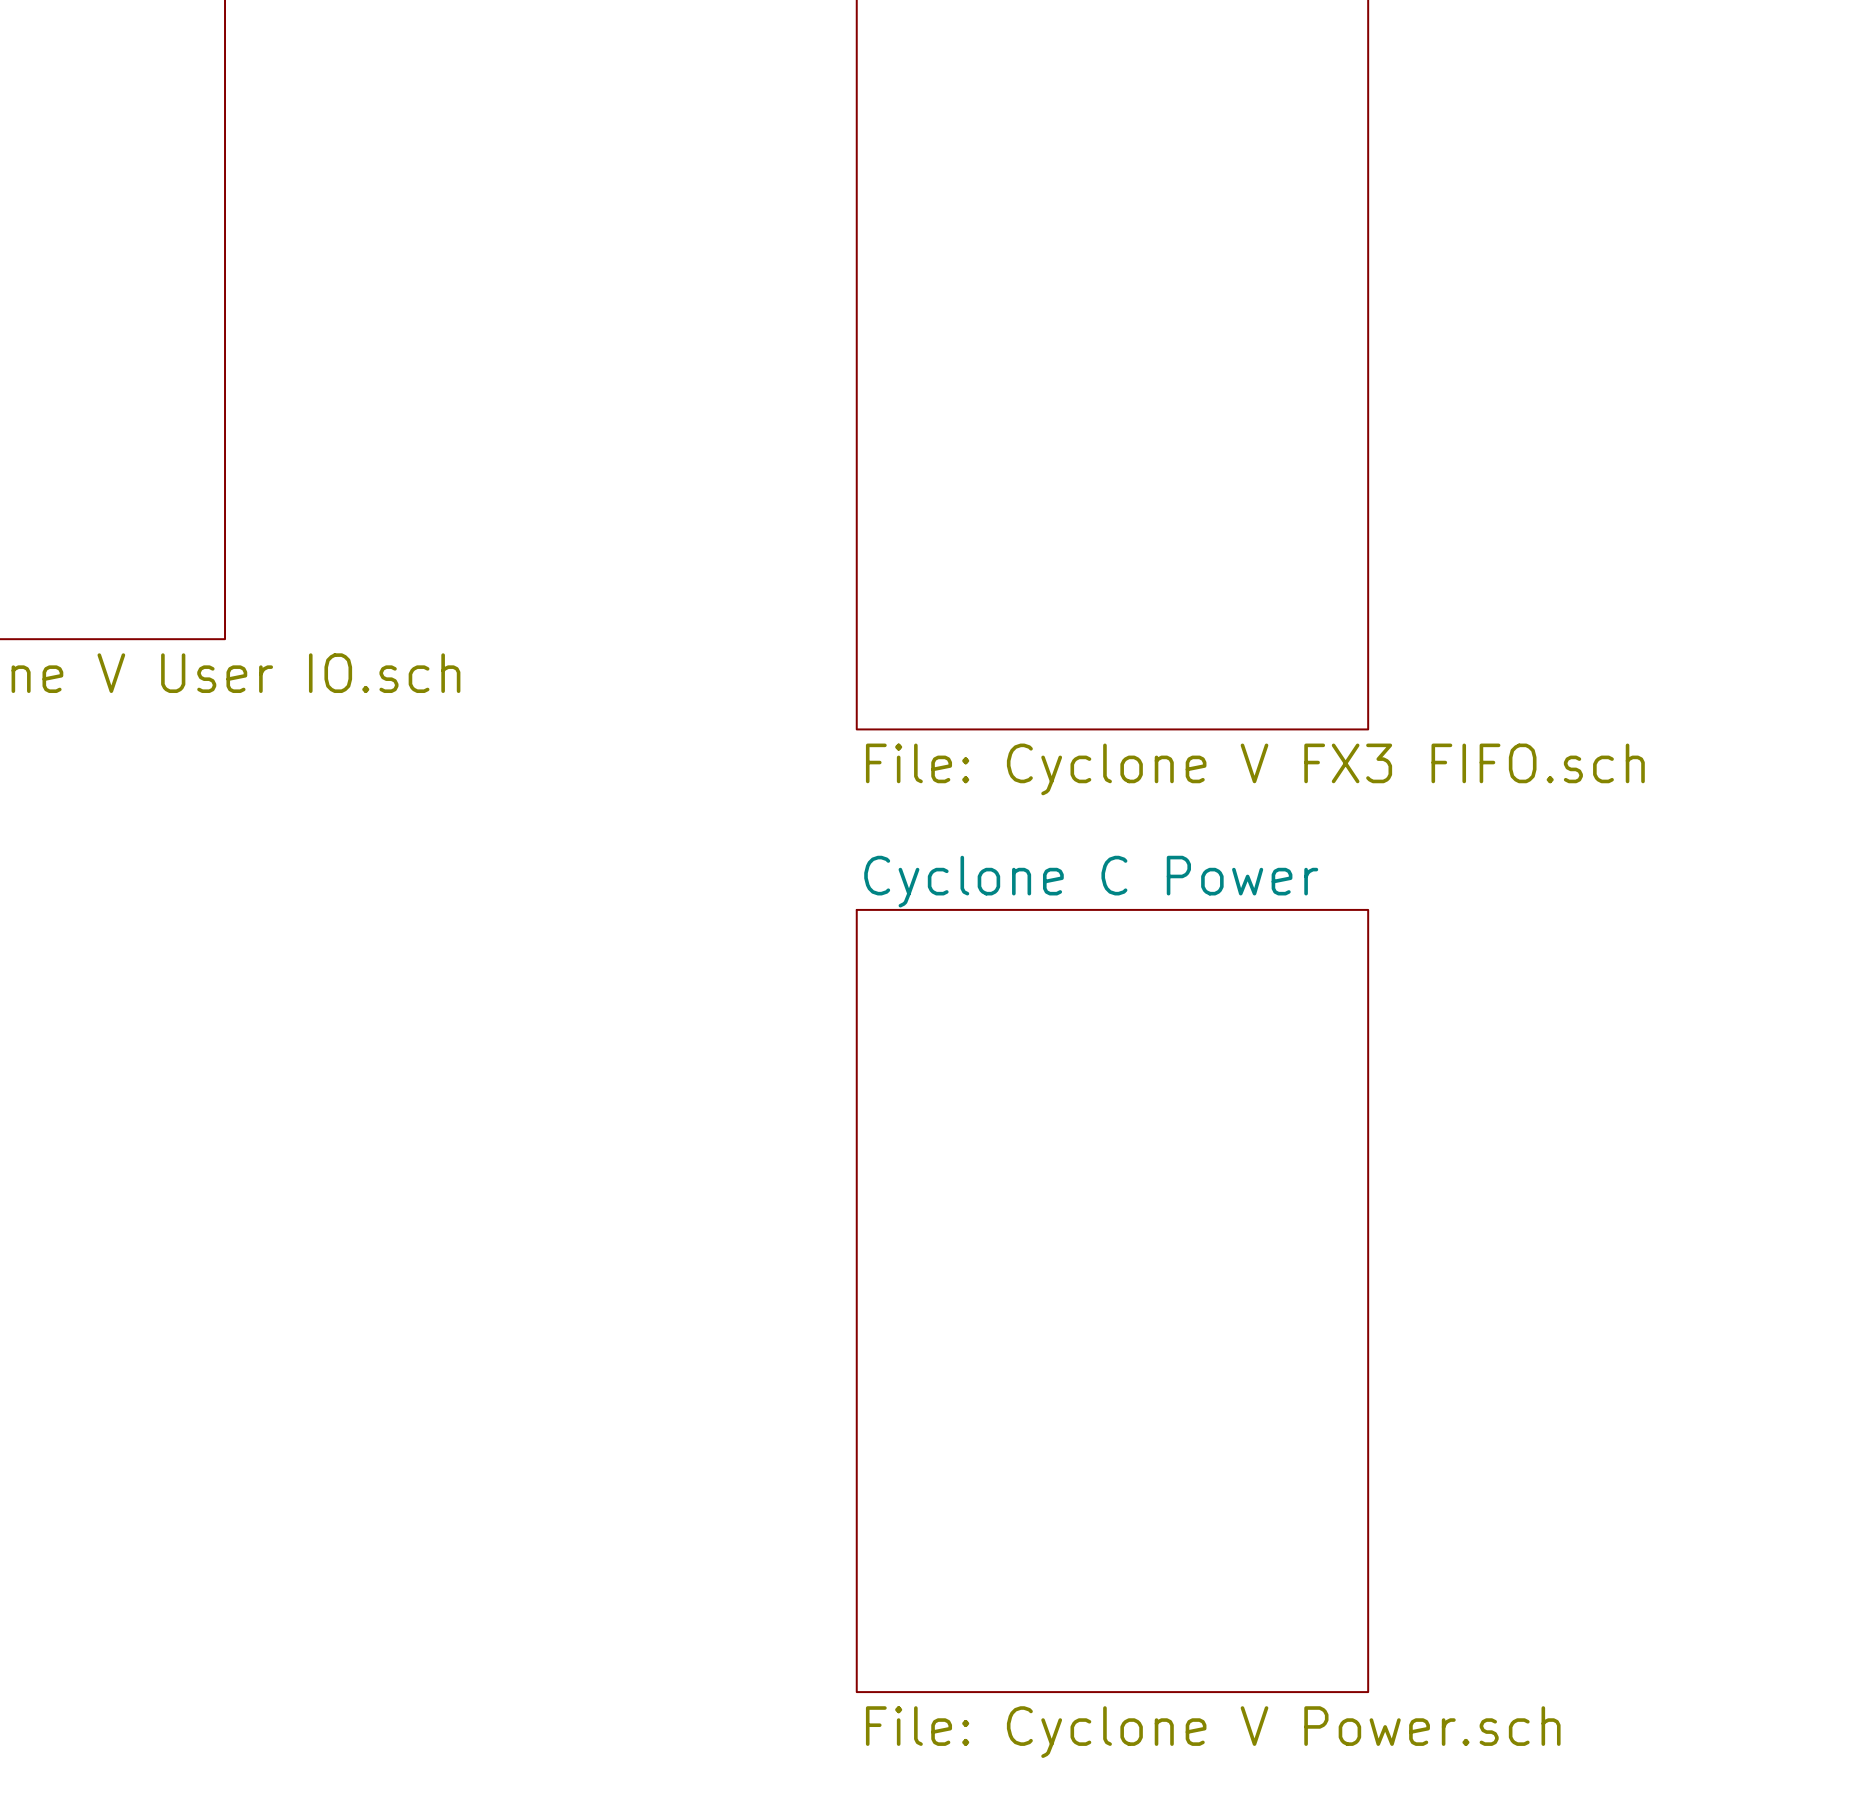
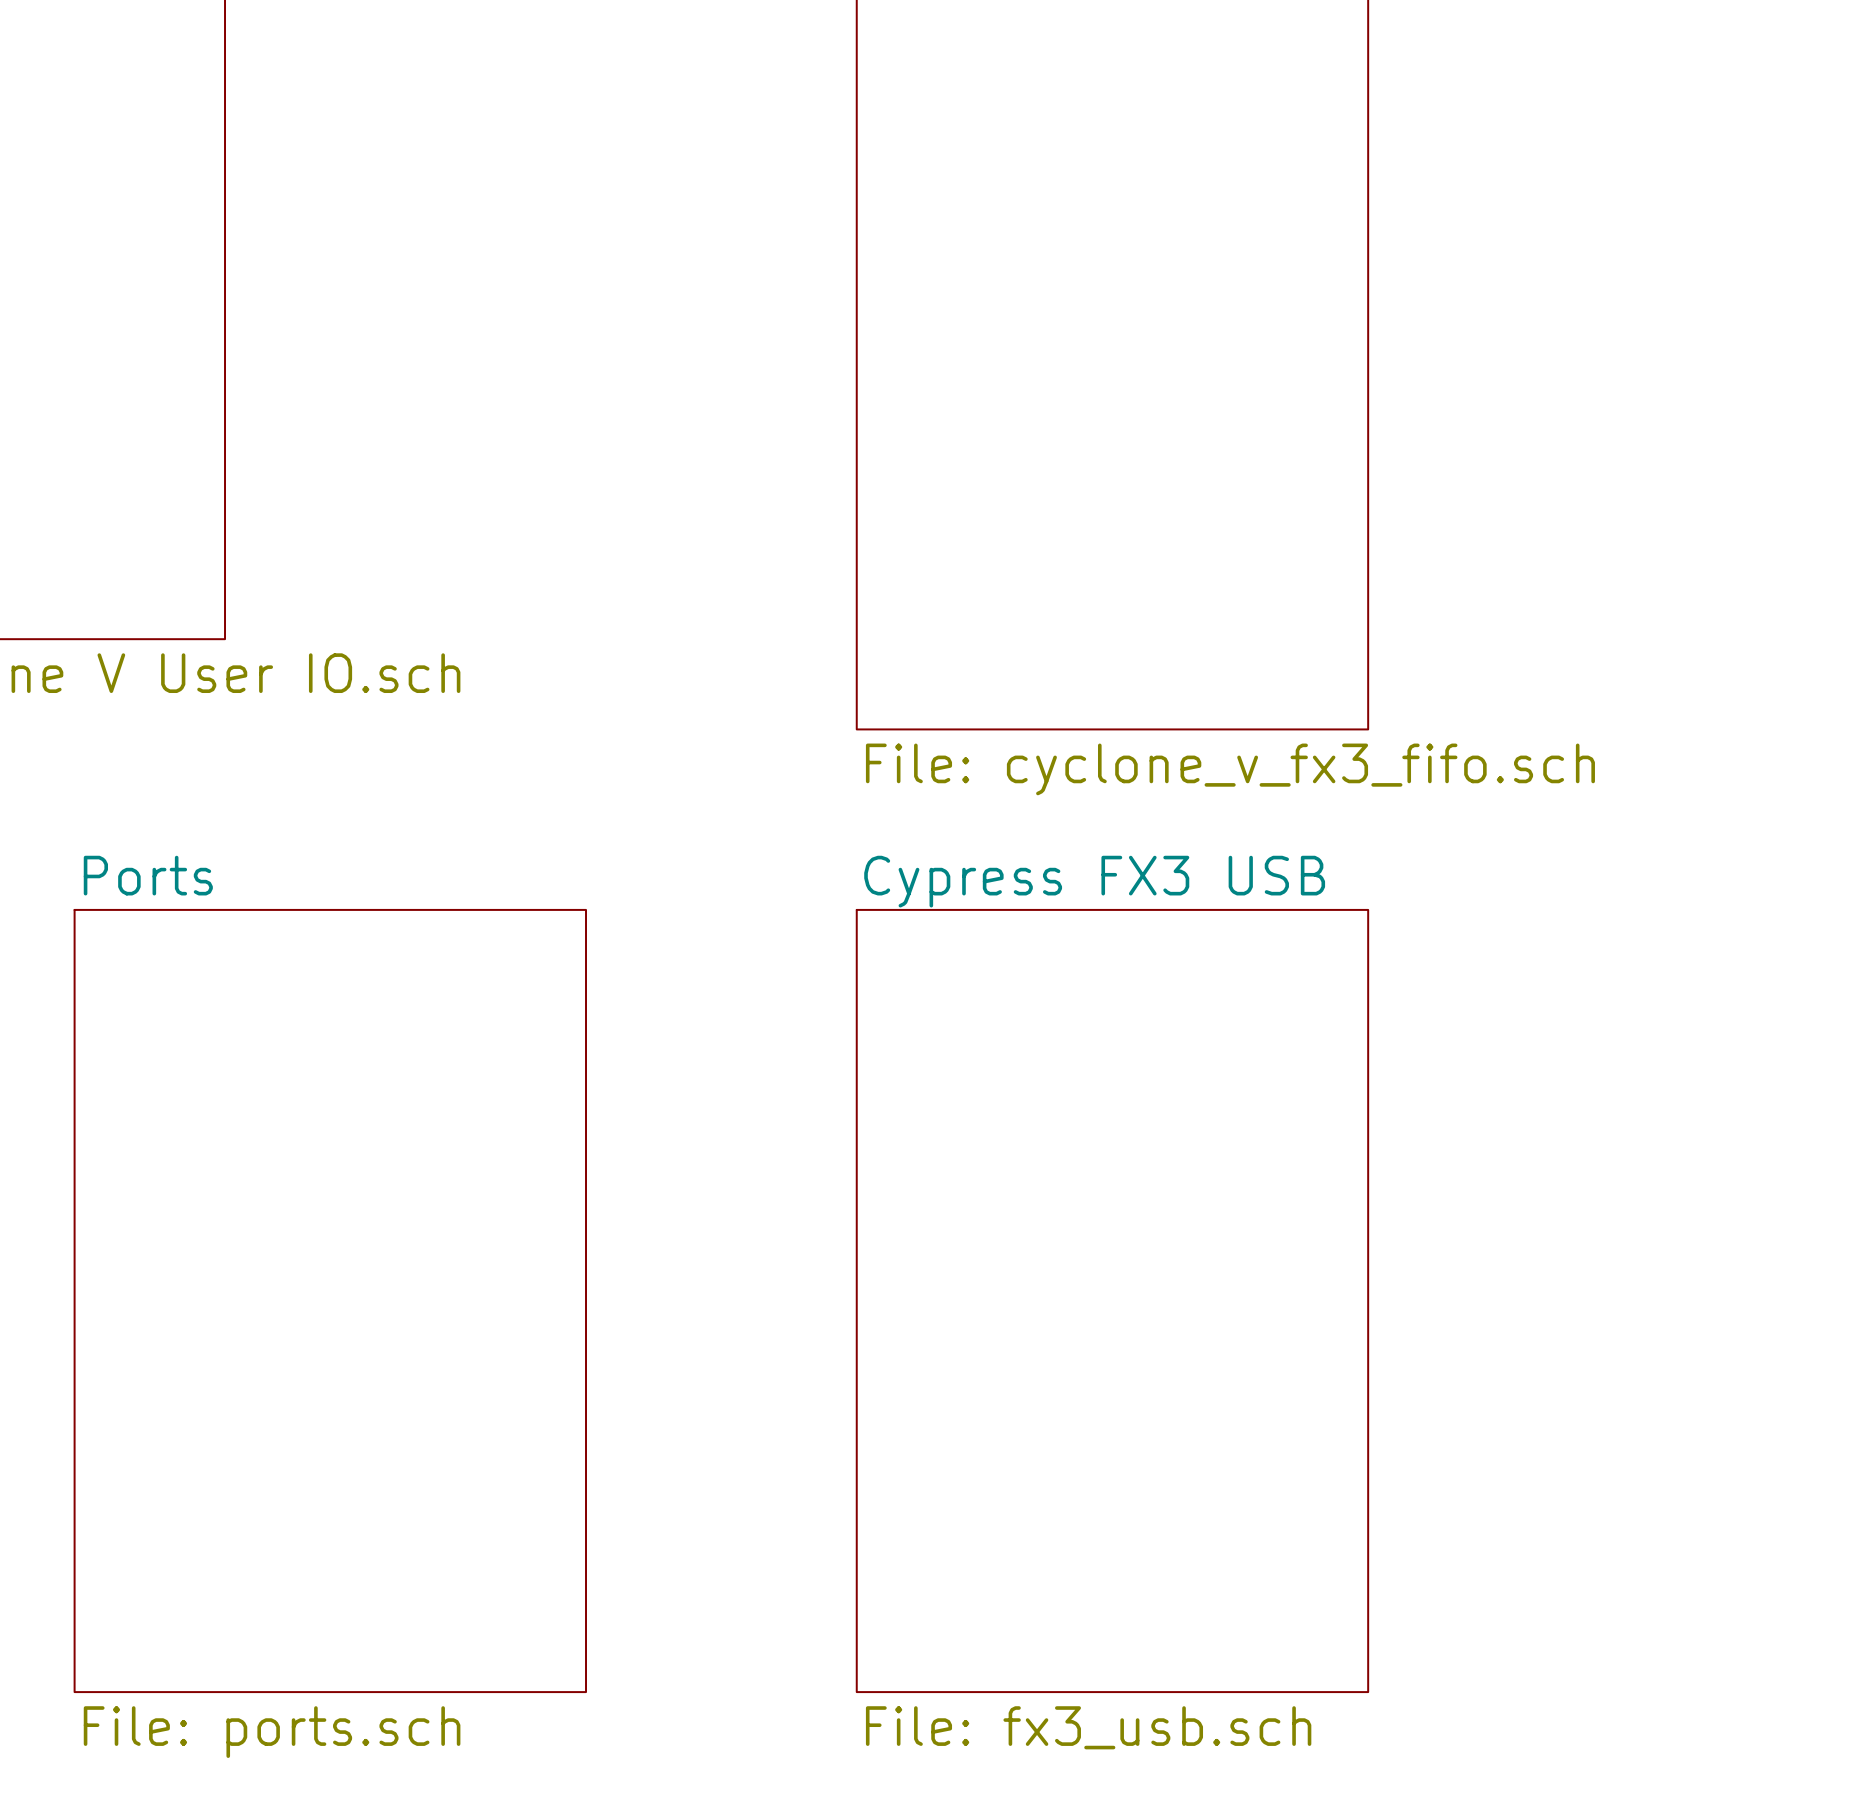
sheet value: File: Cyclone V FX3 FIFO.sch (1255, 769) -> File: cyclone_v_fx3_fifo.sch (1230, 769)
sheet Cyclone C Power name: Cyclone C Power (1091, 881) -> Cypress FX3 USB (1094, 881)
sheet Ports: none -> File: ports.sch (330, 1301)
sheet Cyclone C Power value: File: Cyclone V Power.sch (1213, 1732) -> File: fx3_usb.sch (1088, 1727)

